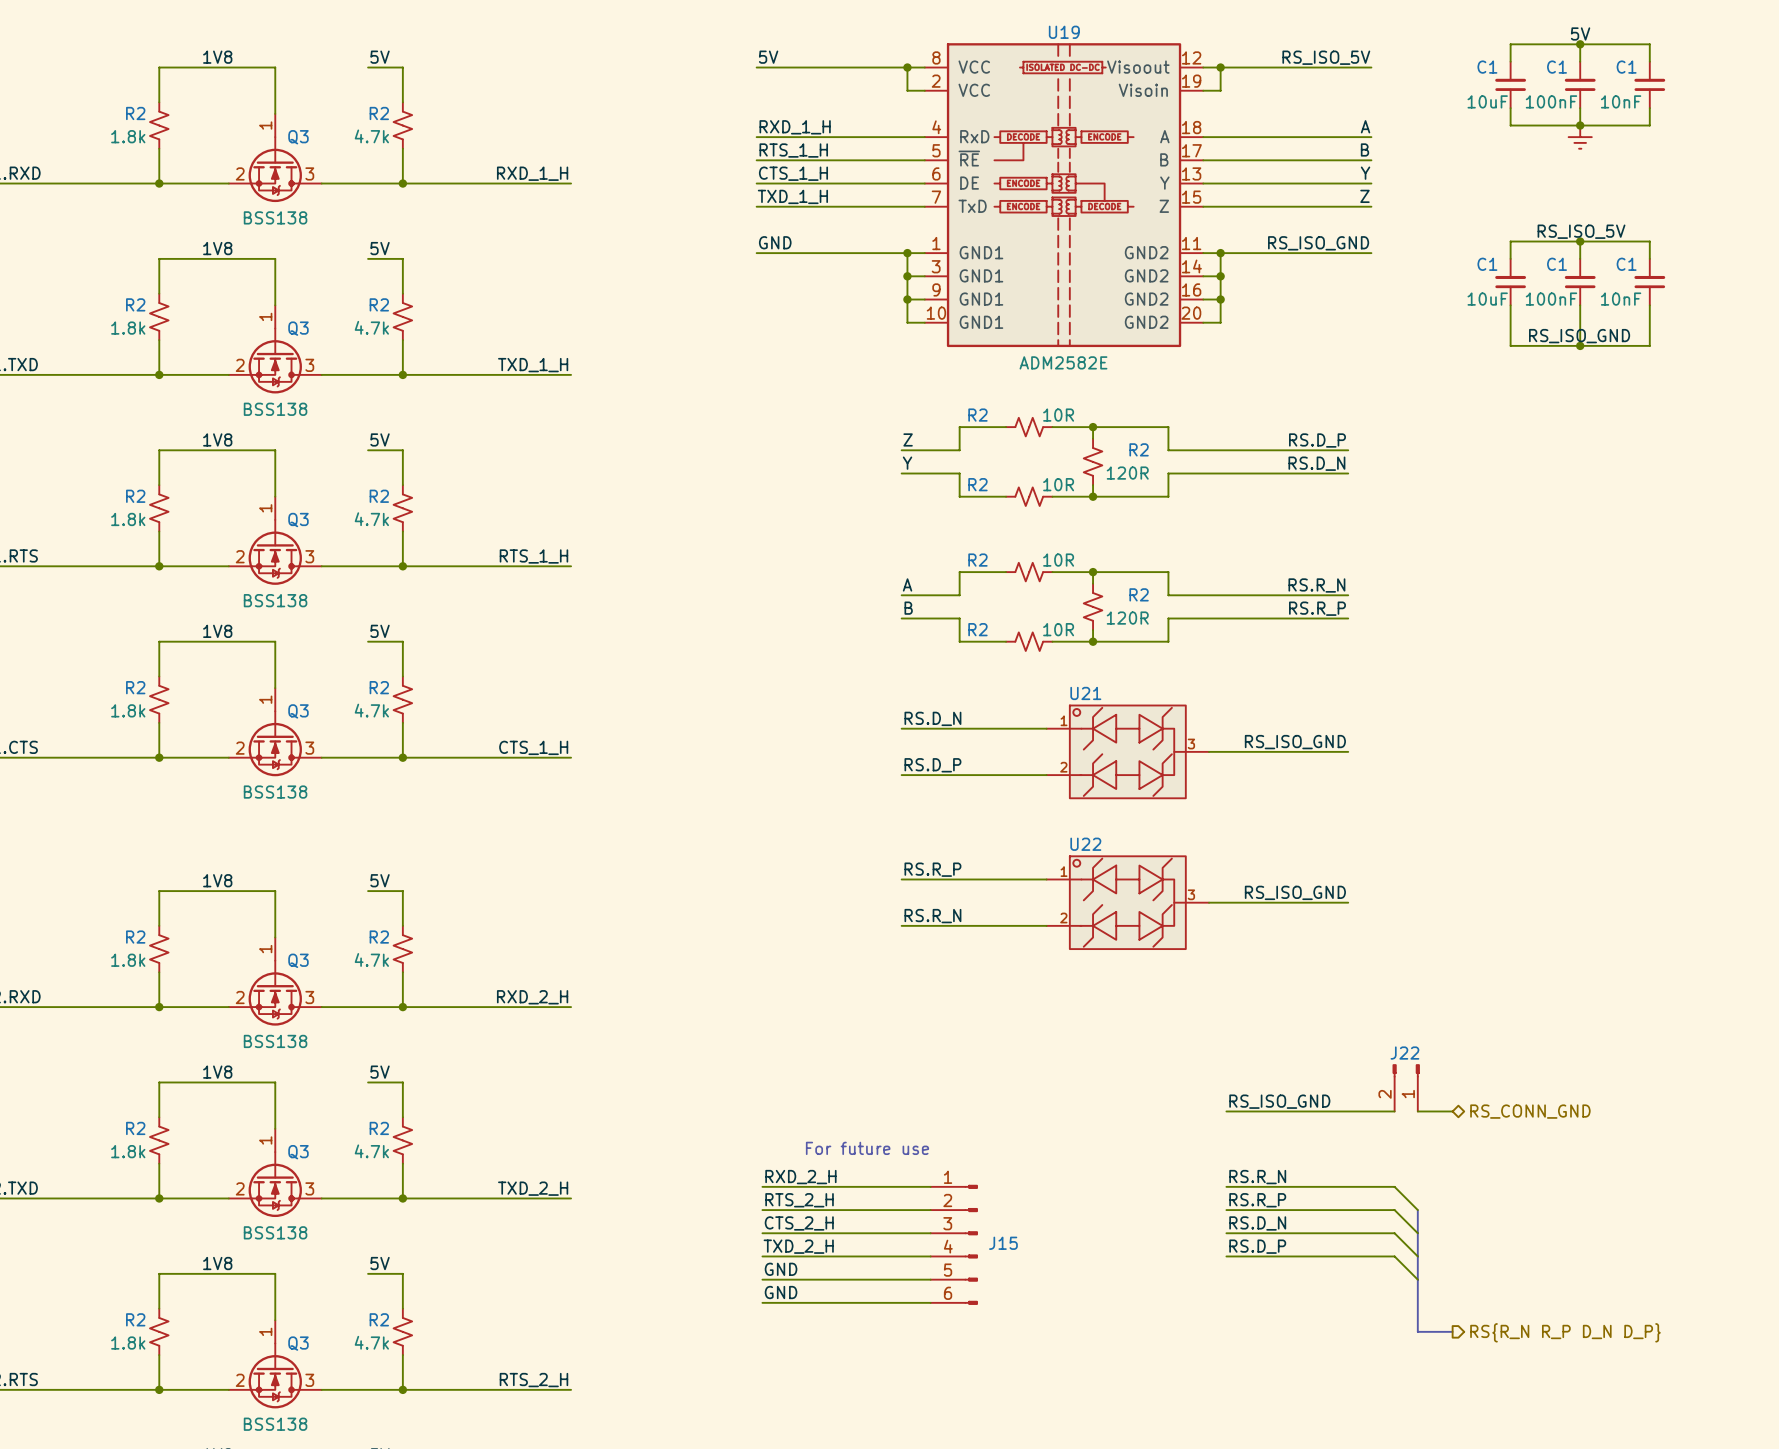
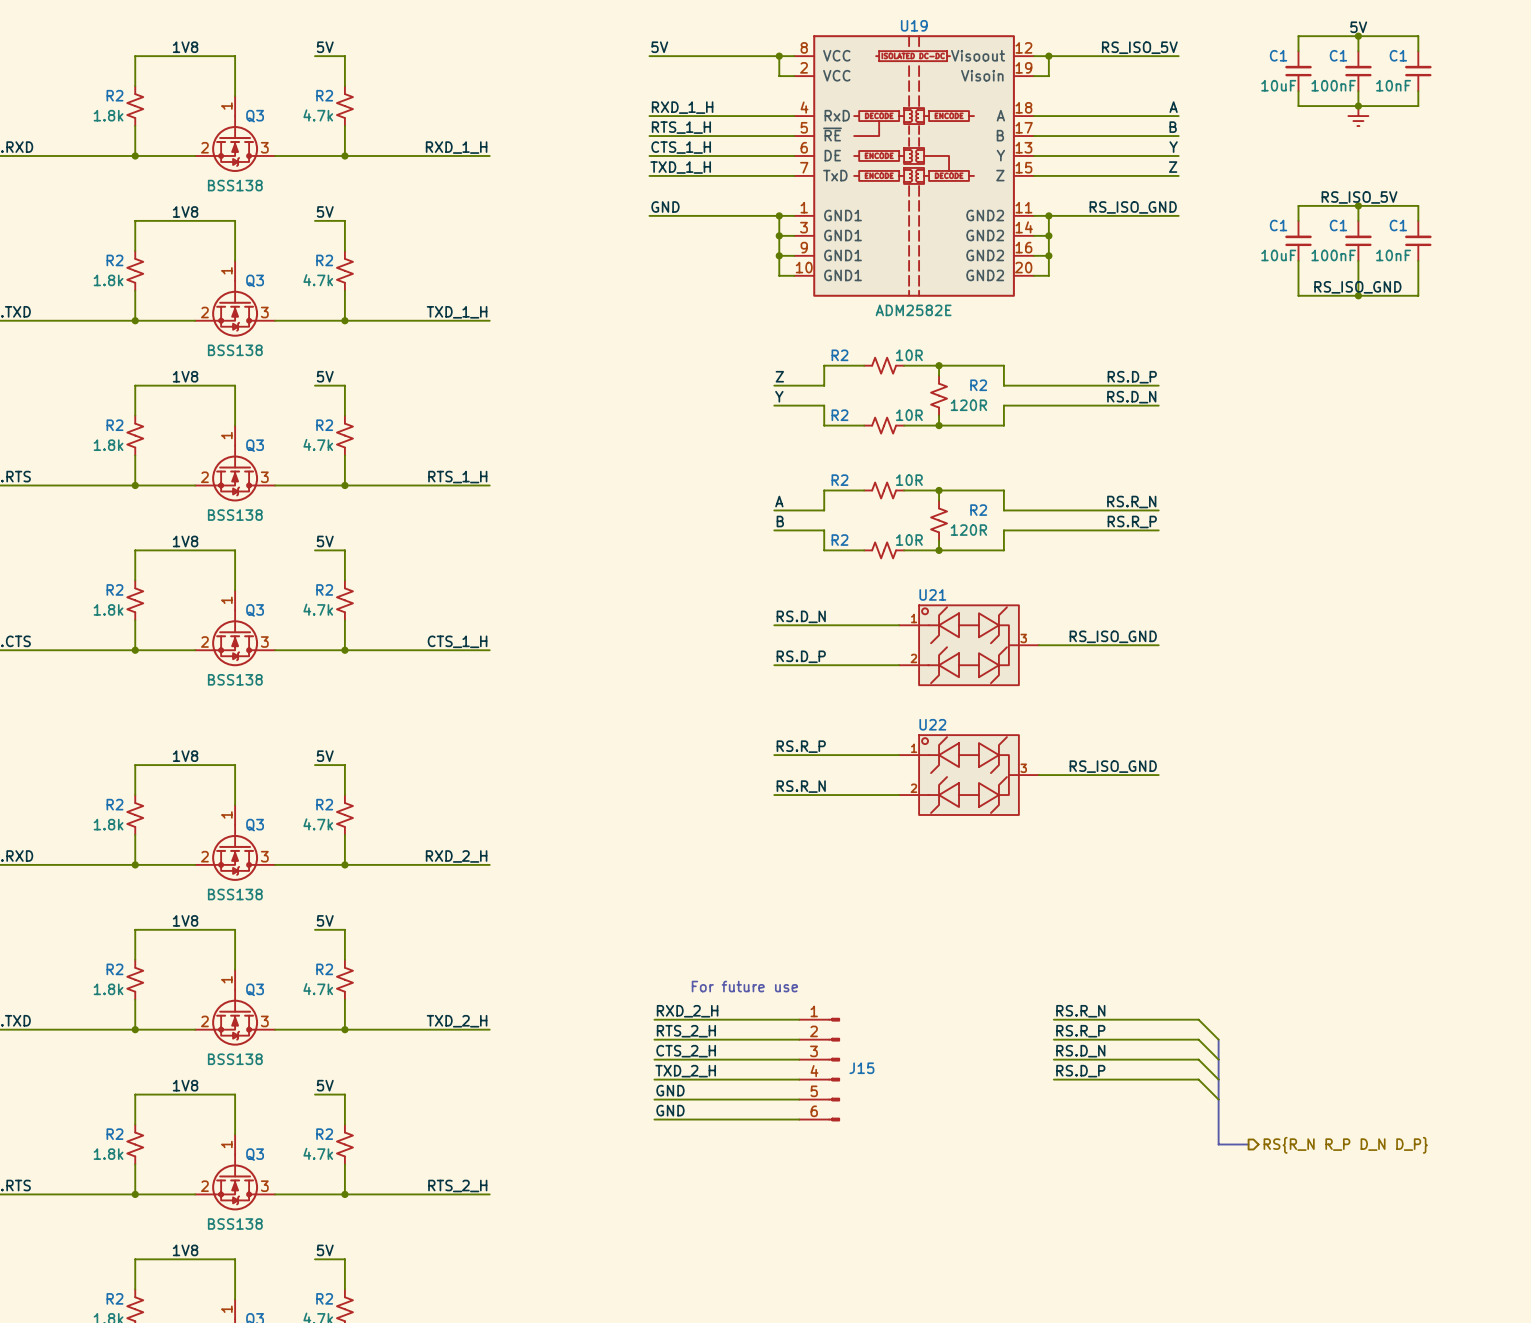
J22: (1406, 1087) -> none
label: RS_ISO_GND (1279, 1101) -> none
wire: (1226, 1111) (1394, 1111) -> none
wire: (1417, 1111) (1452, 1111) -> none
hierarchical label: RS_CONN_GND (1530, 1111) -> none

